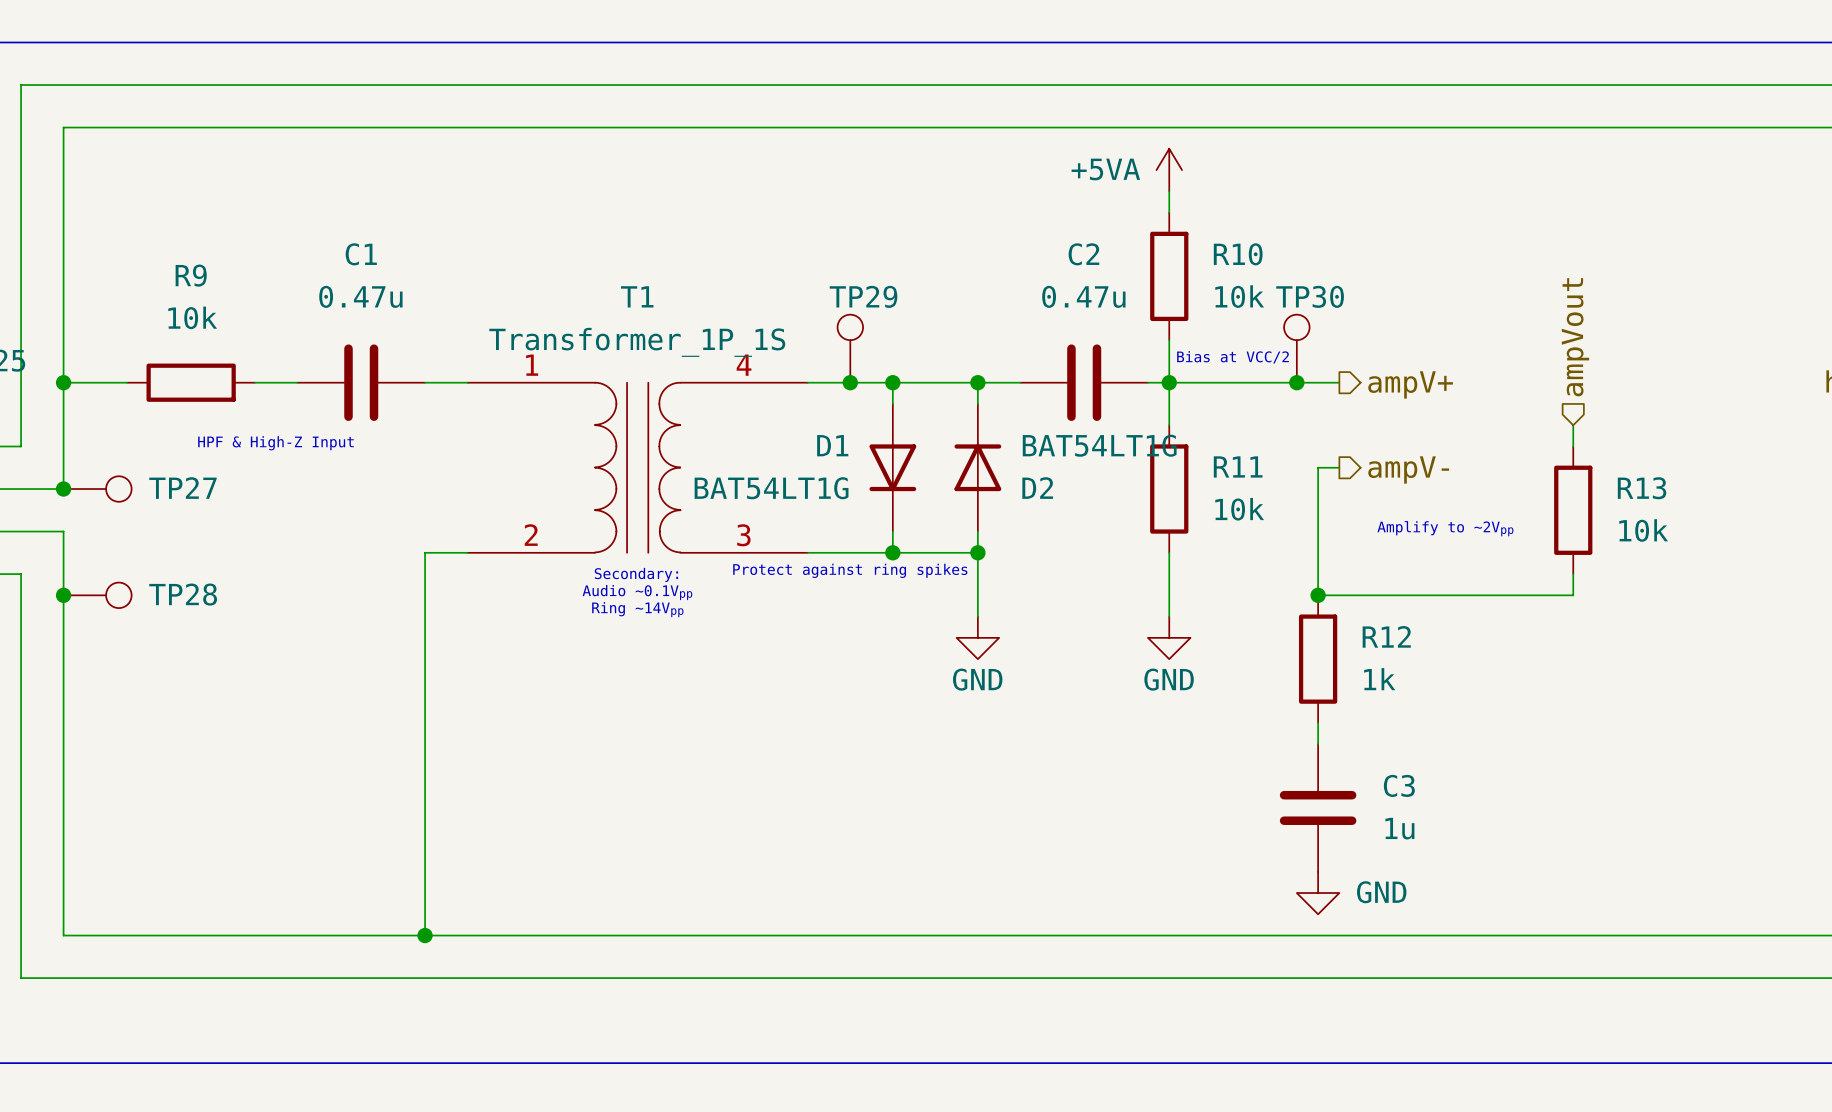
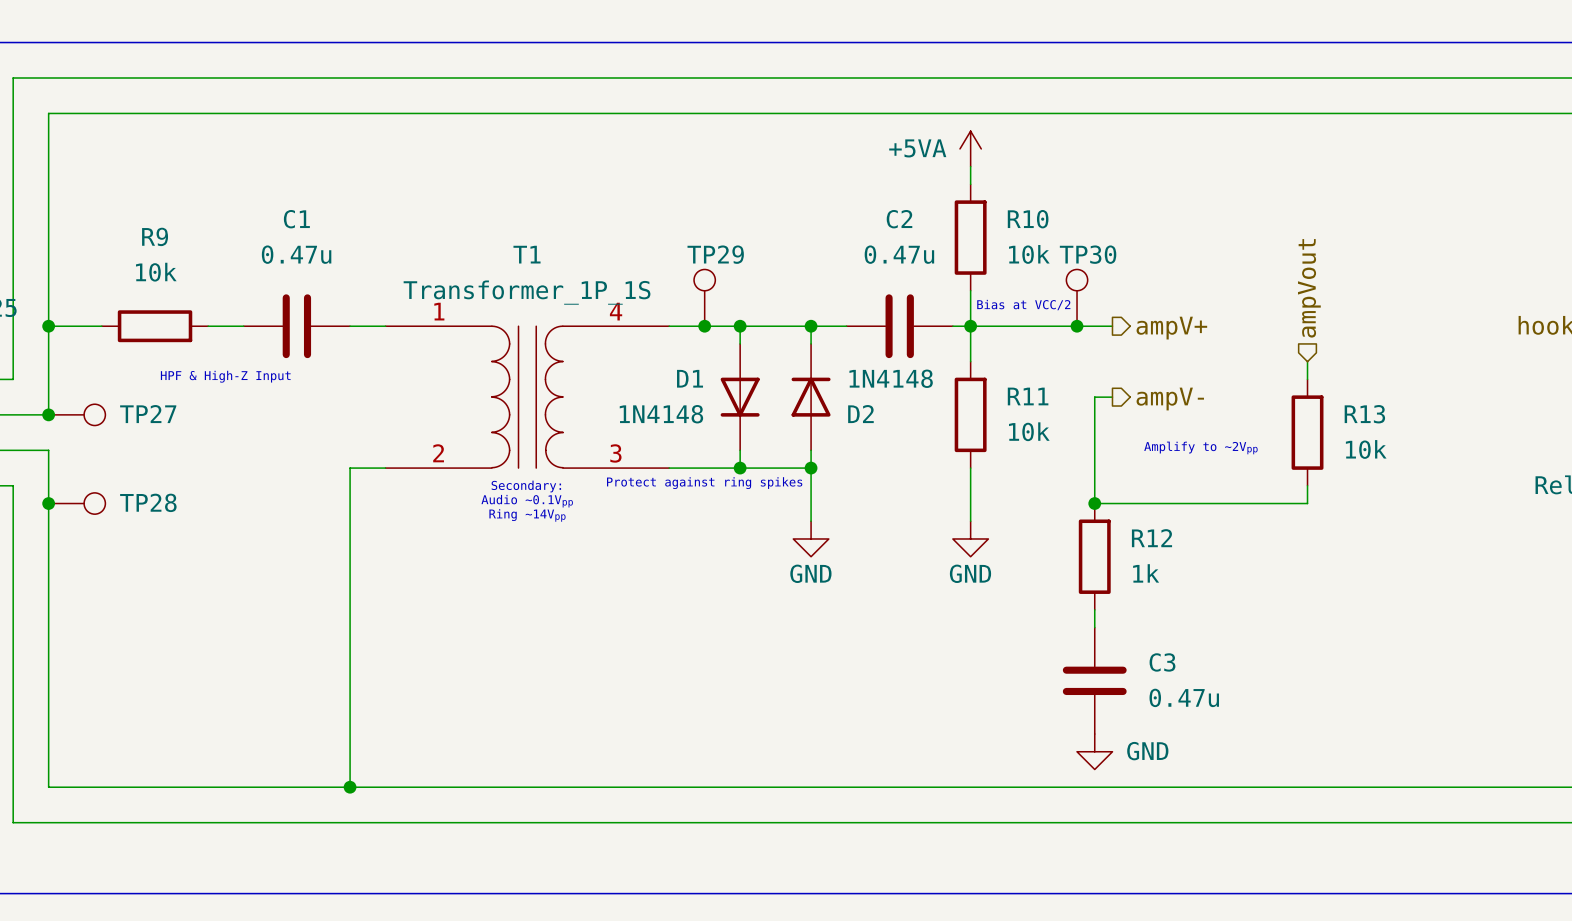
D2 value: BAT54LT1G (1099, 445) -> 1N4148 (891, 378)
D1 value: BAT54LT1G (771, 488) -> 1N4148 (661, 414)
C3 value: 1u (1399, 828) -> 0.47u (1184, 697)

